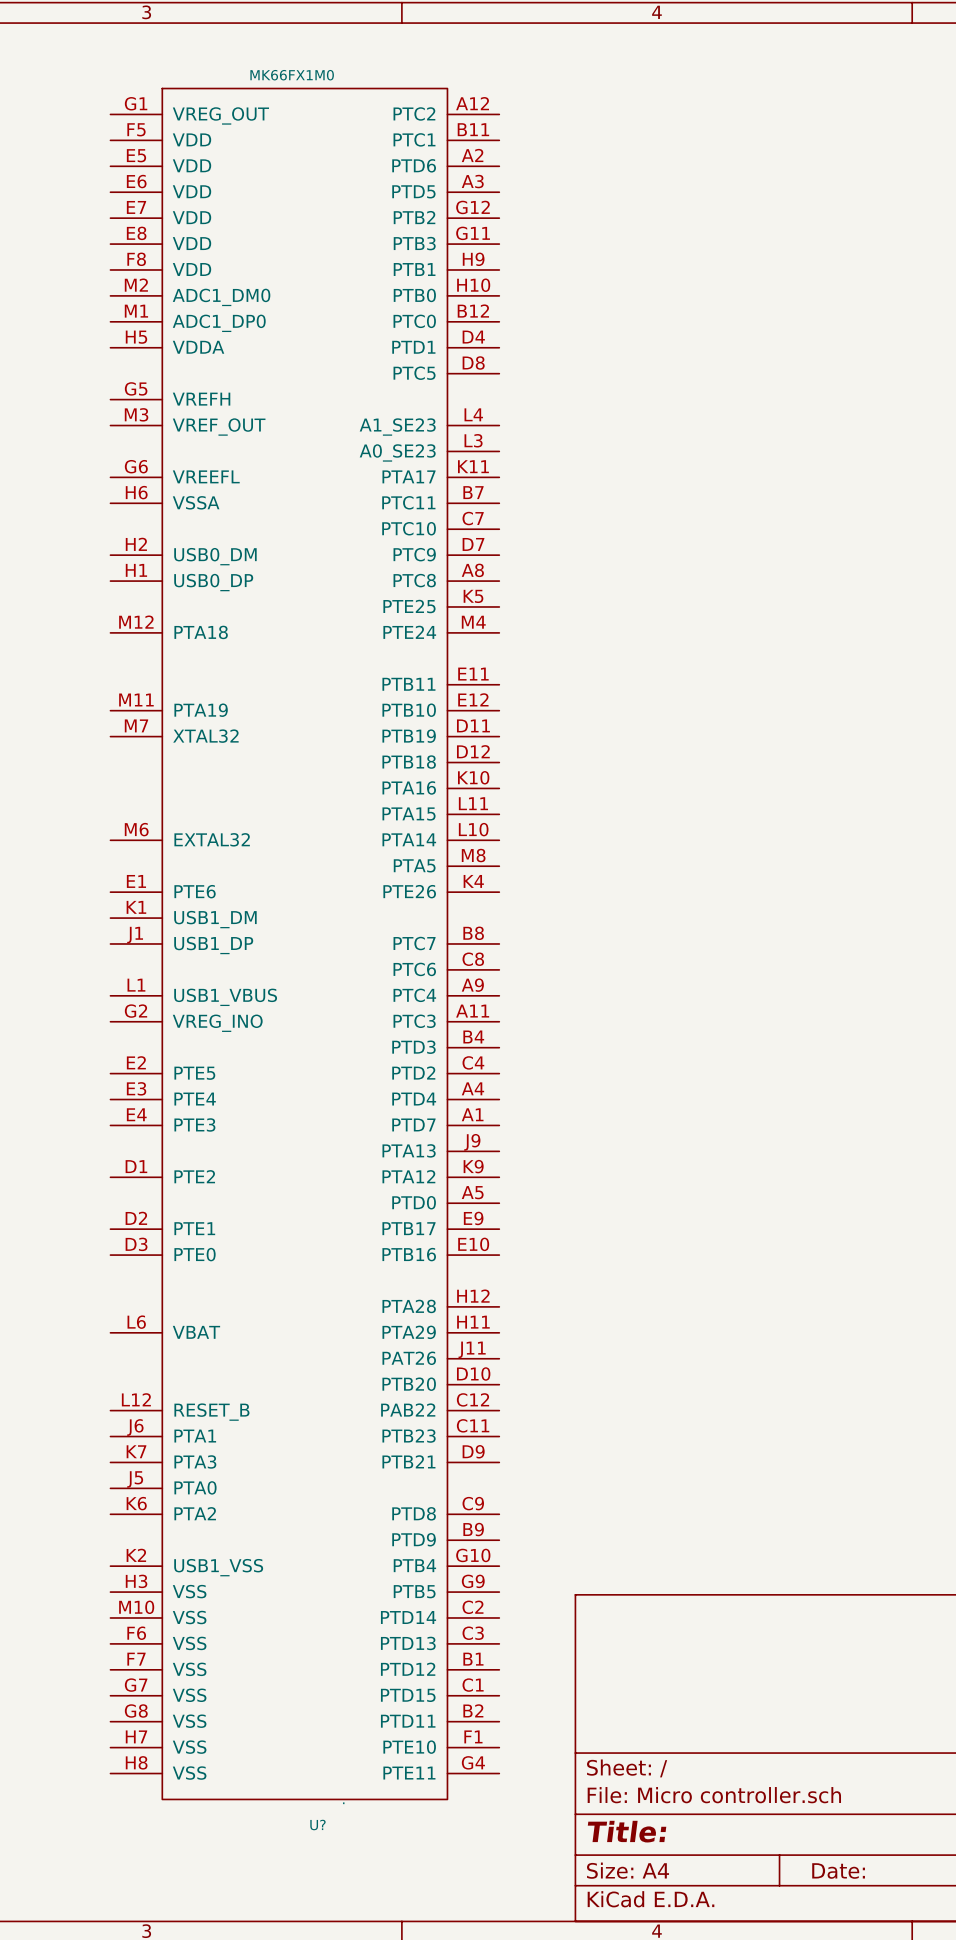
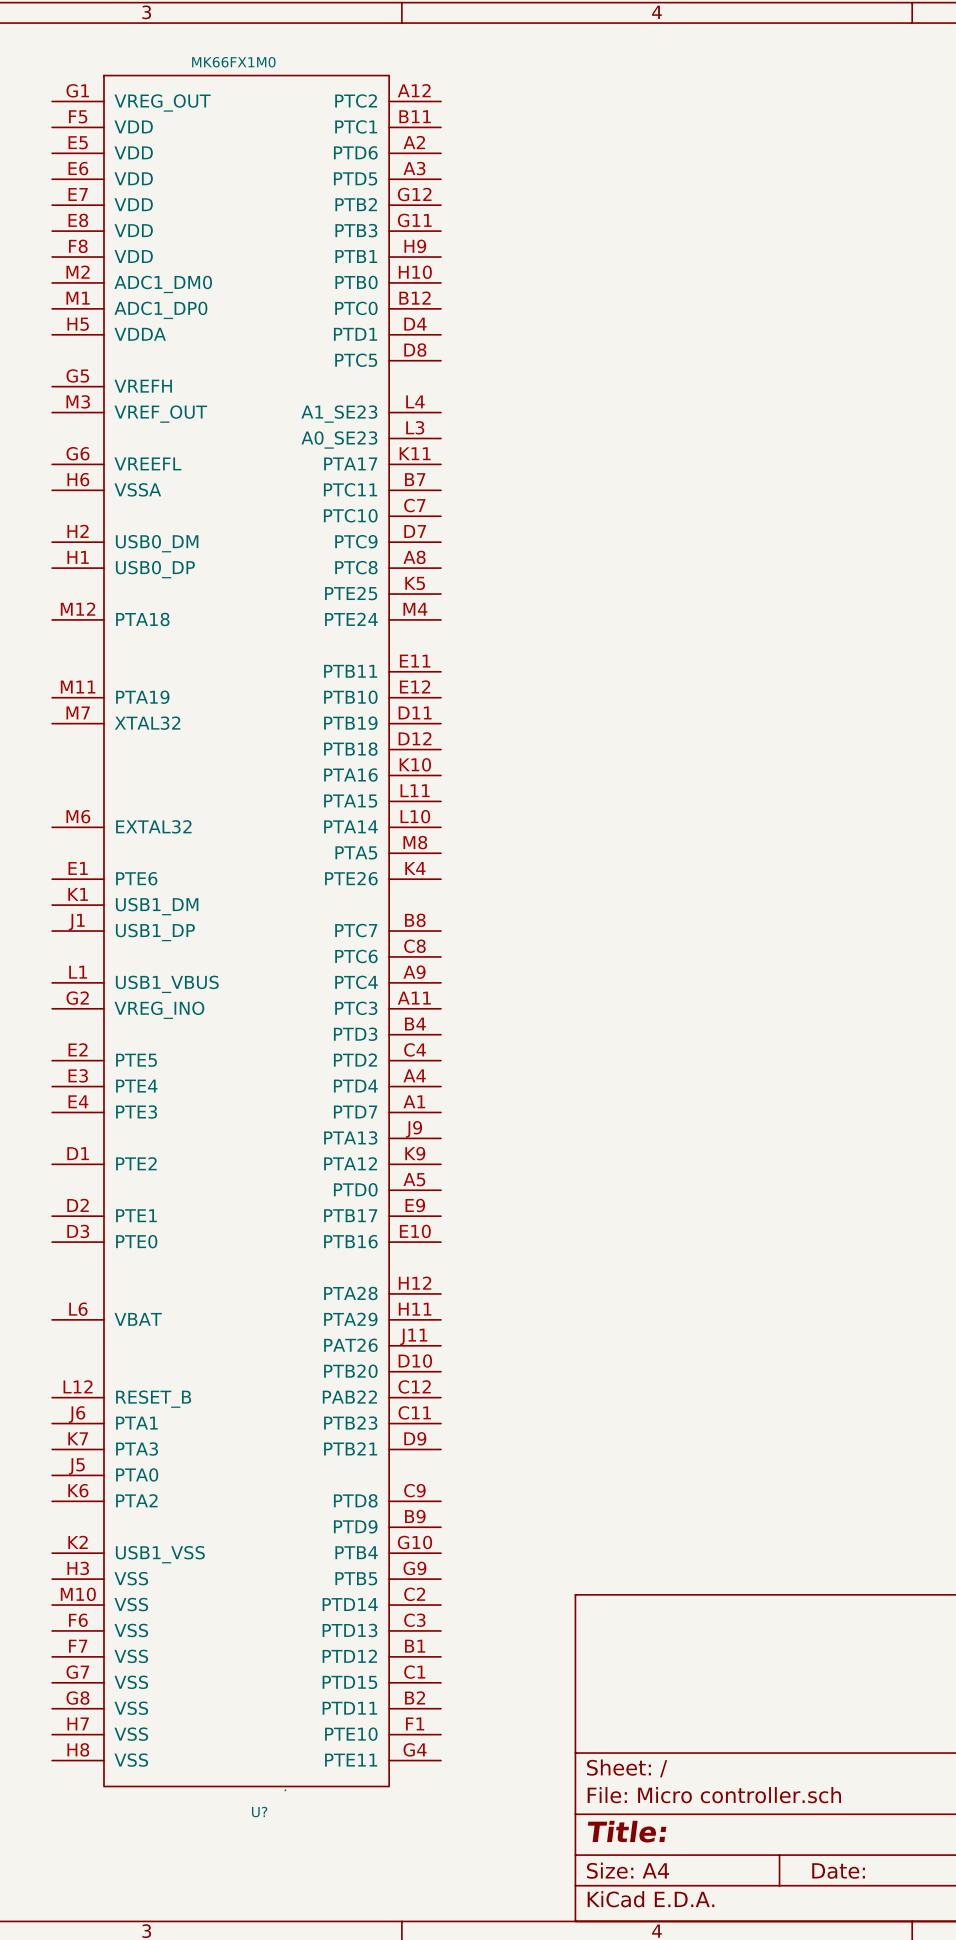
U? position: (304, 943) -> (246, 931)

